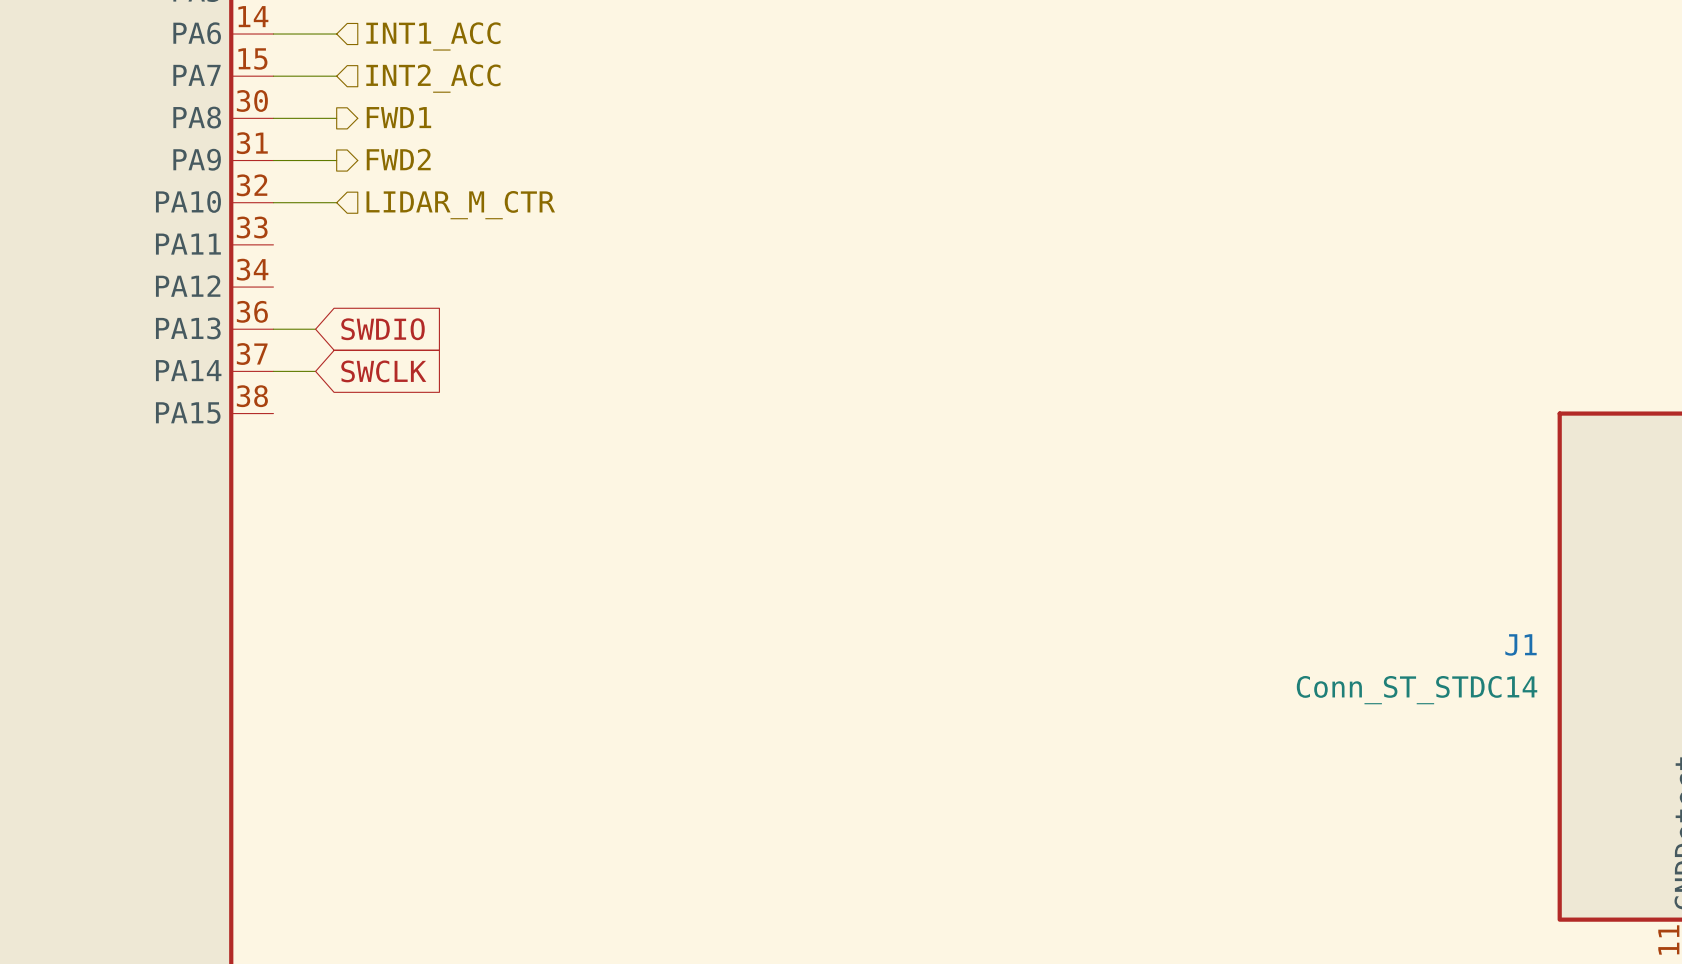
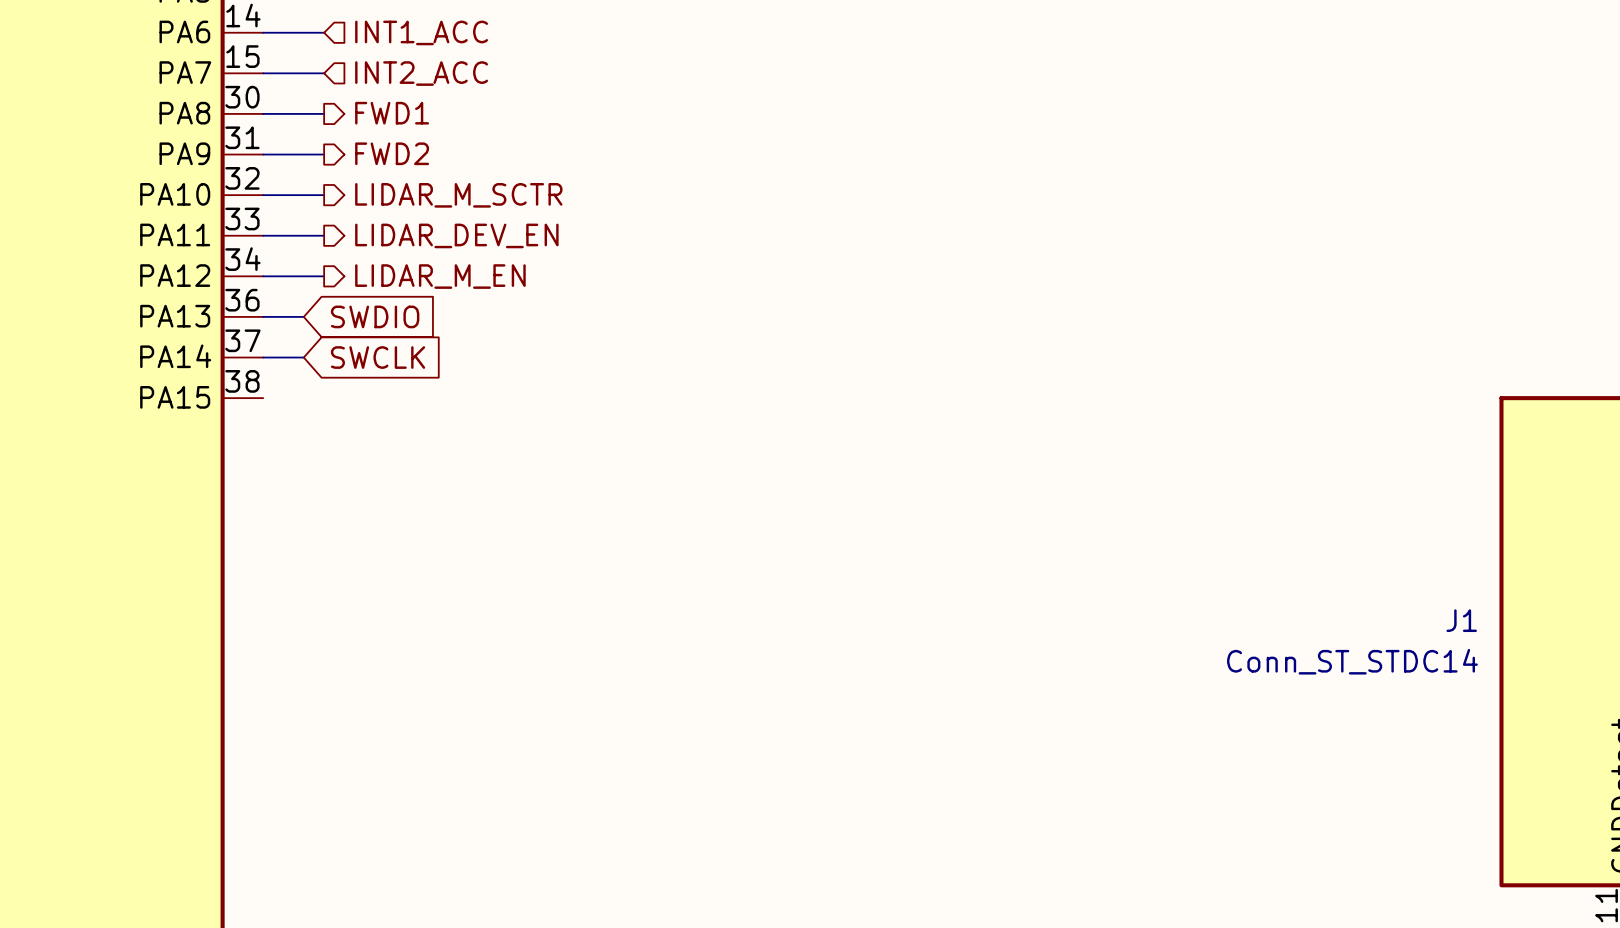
hierarchical label shape: input (460, 205) -> output (458, 195)
hierarchical label: LIDAR_M_CTR (460, 205) -> LIDAR_M_SCTR (458, 195)
wire: none -> (263, 235) (324, 235)
hierarchical label: none -> LIDAR_DEV_EN (456, 235)
wire: none -> (263, 276) (324, 276)
hierarchical label: none -> LIDAR_M_EN (440, 276)

